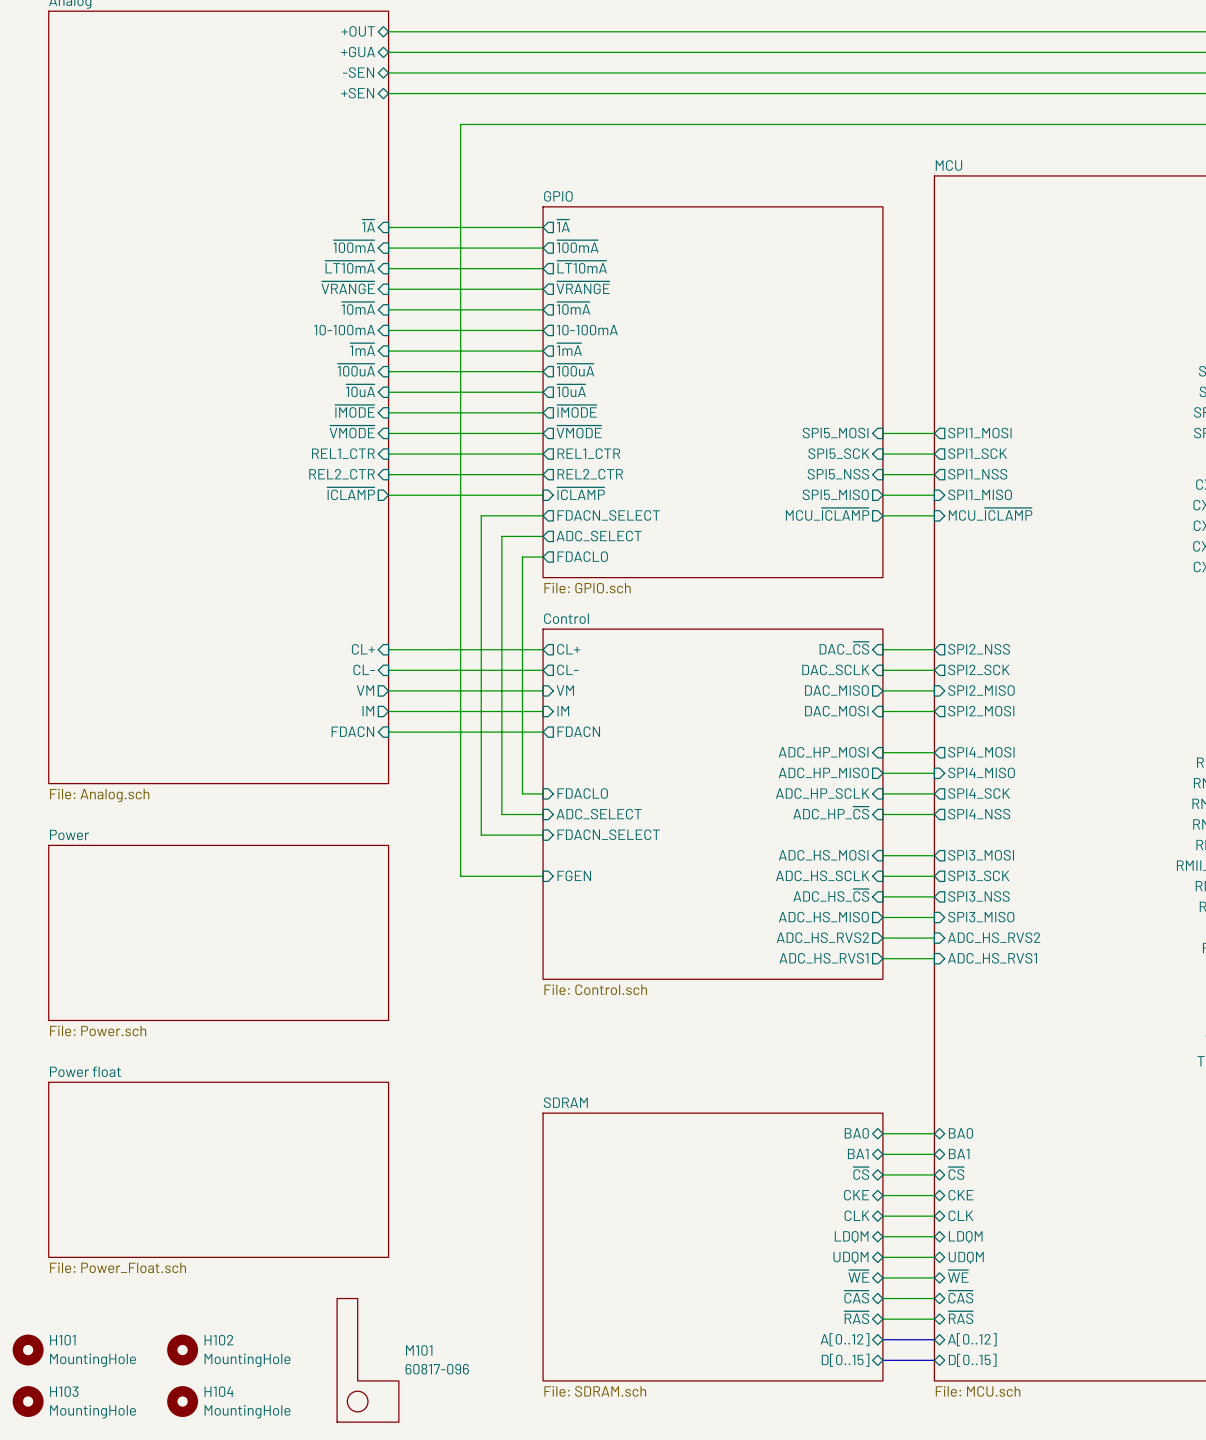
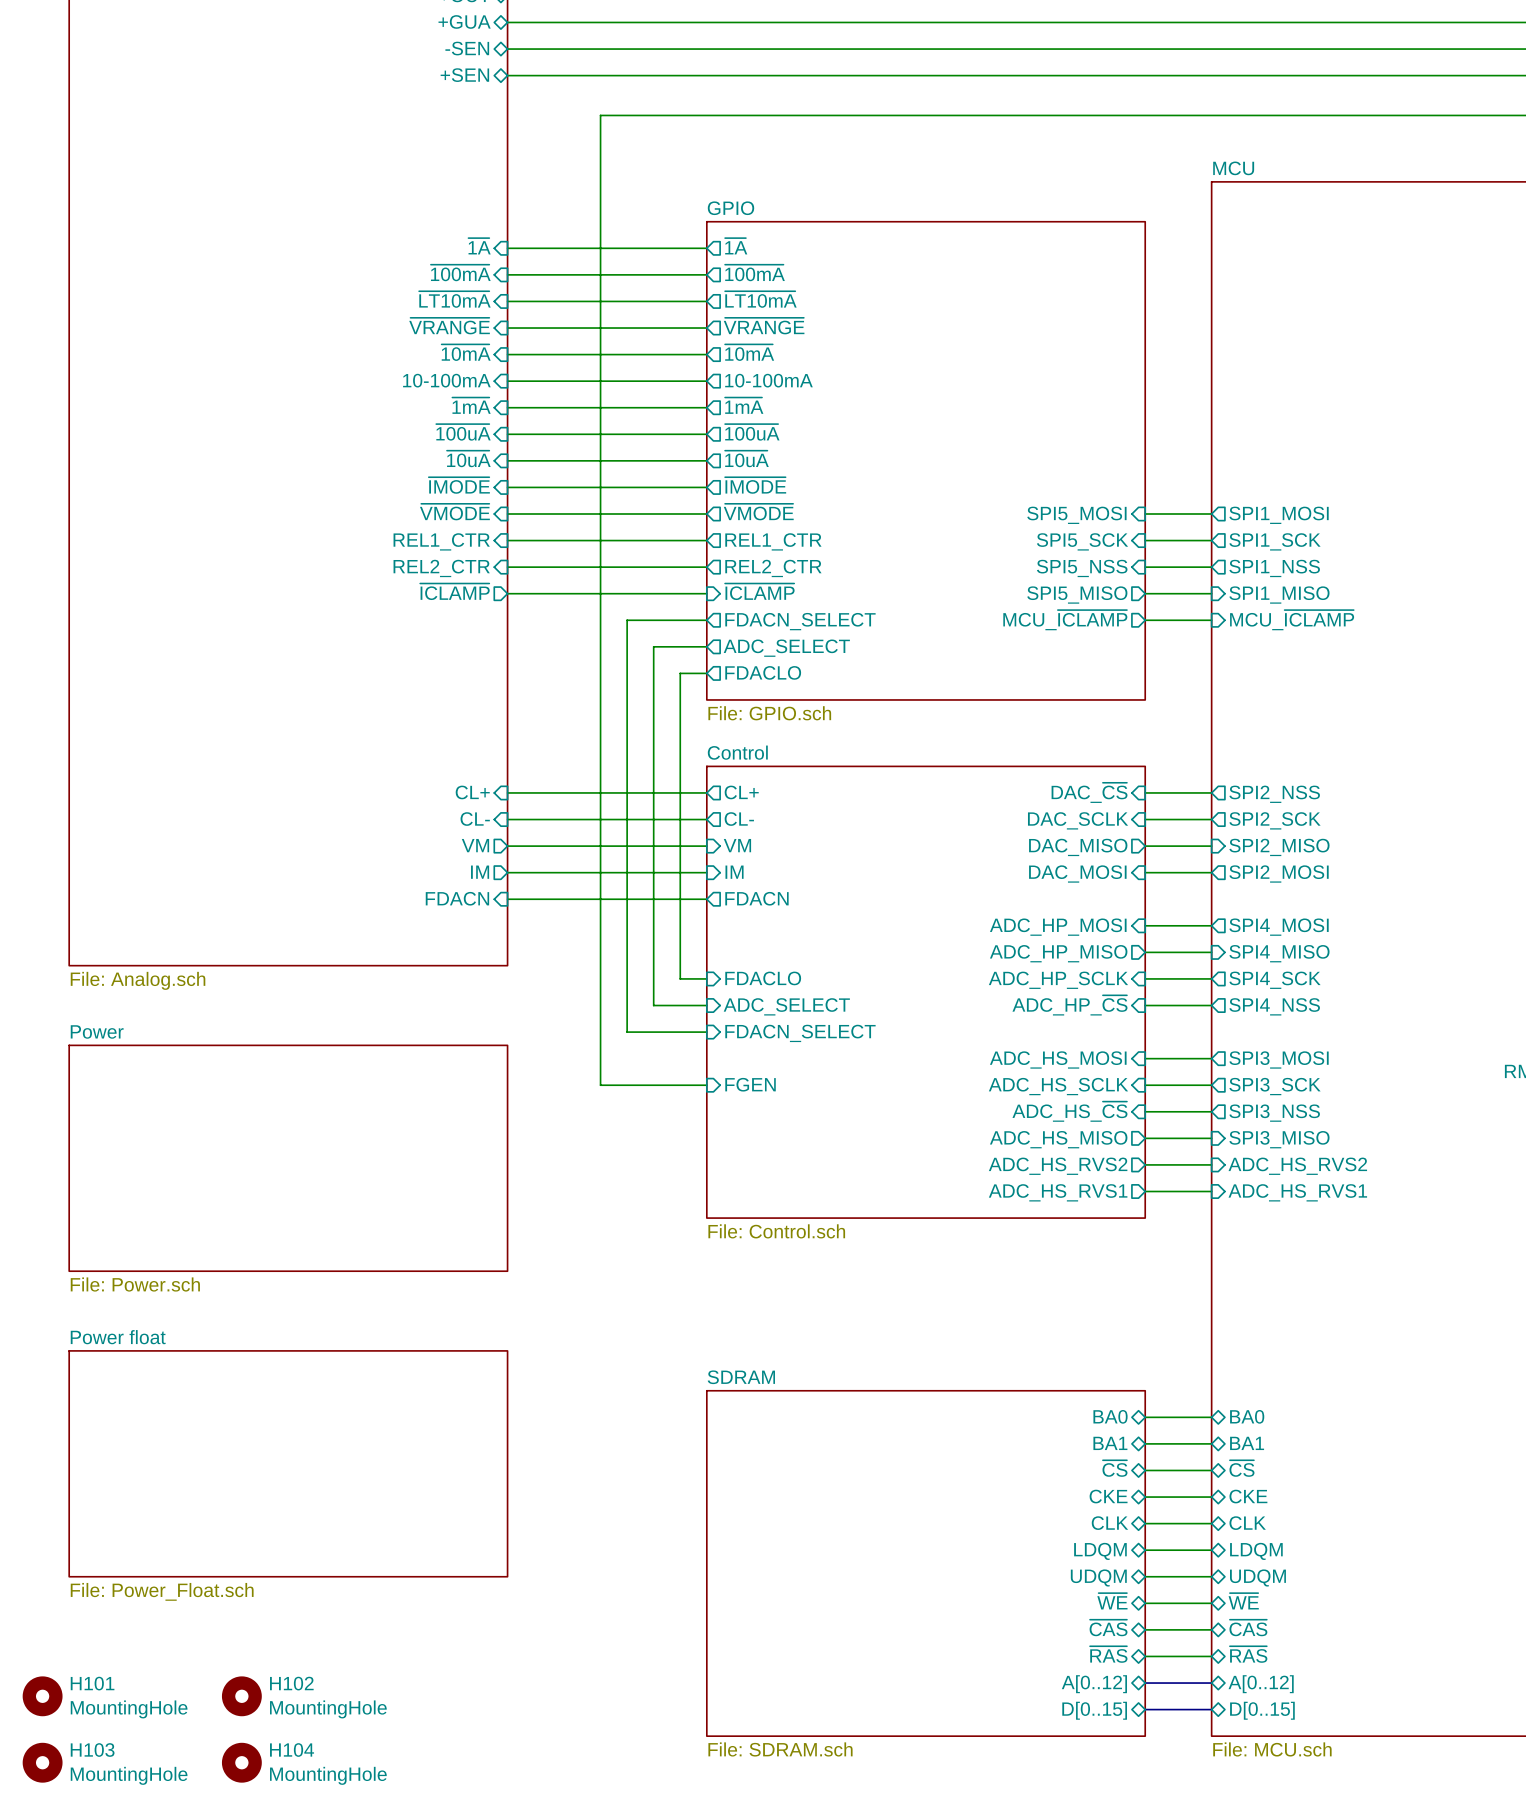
M101: 60817-096 (367, 1360) -> none

